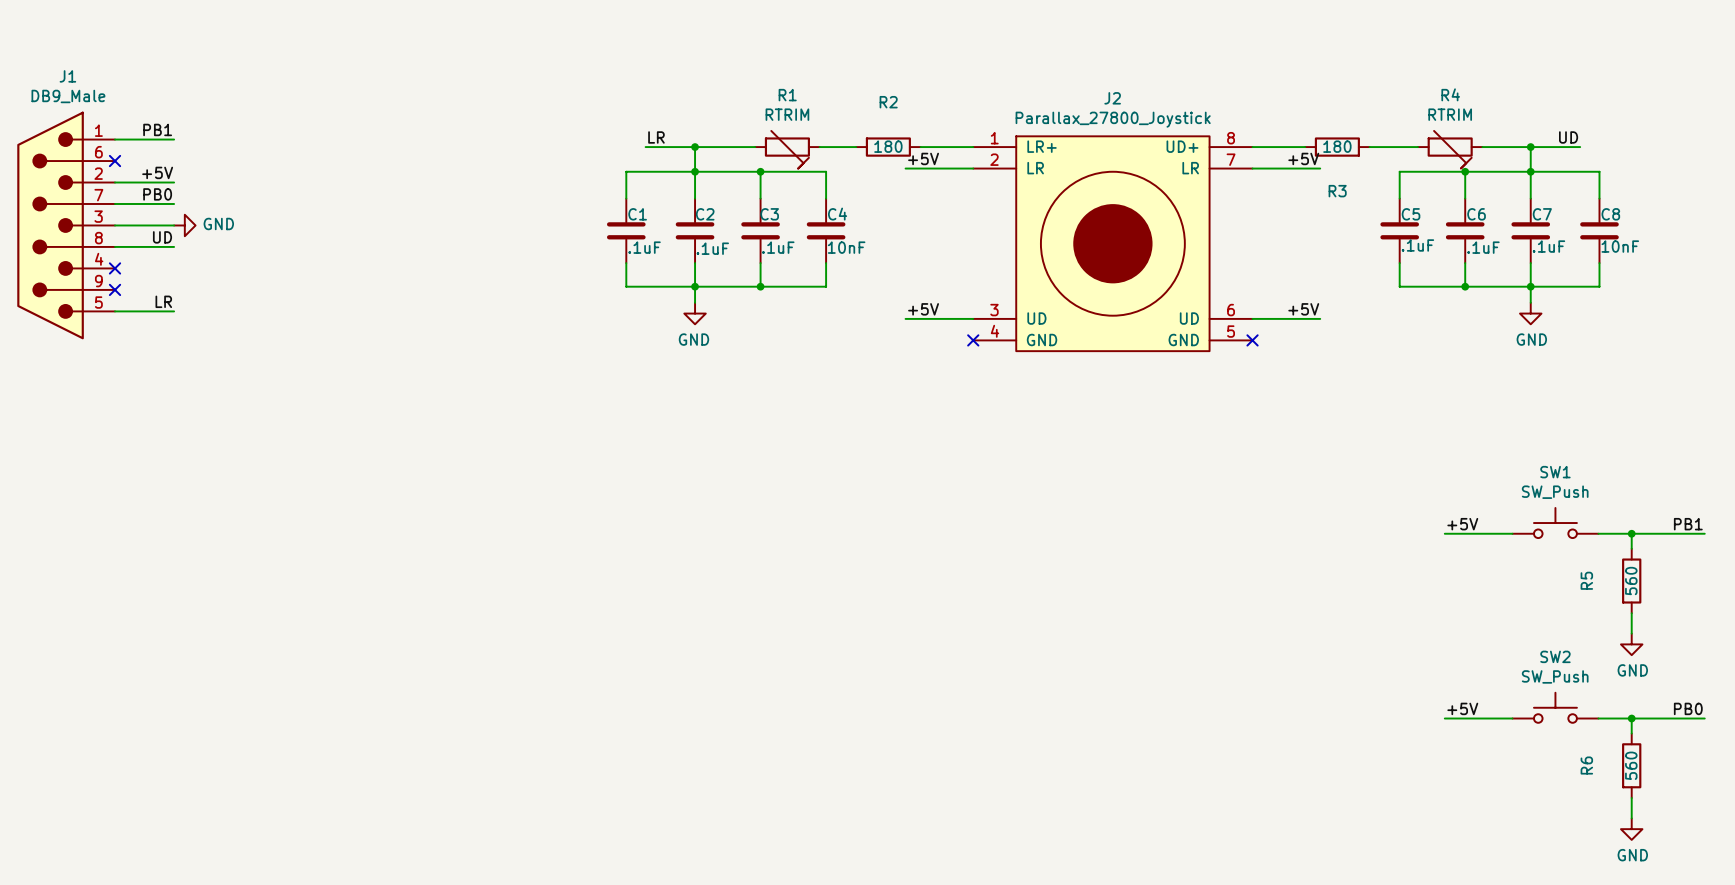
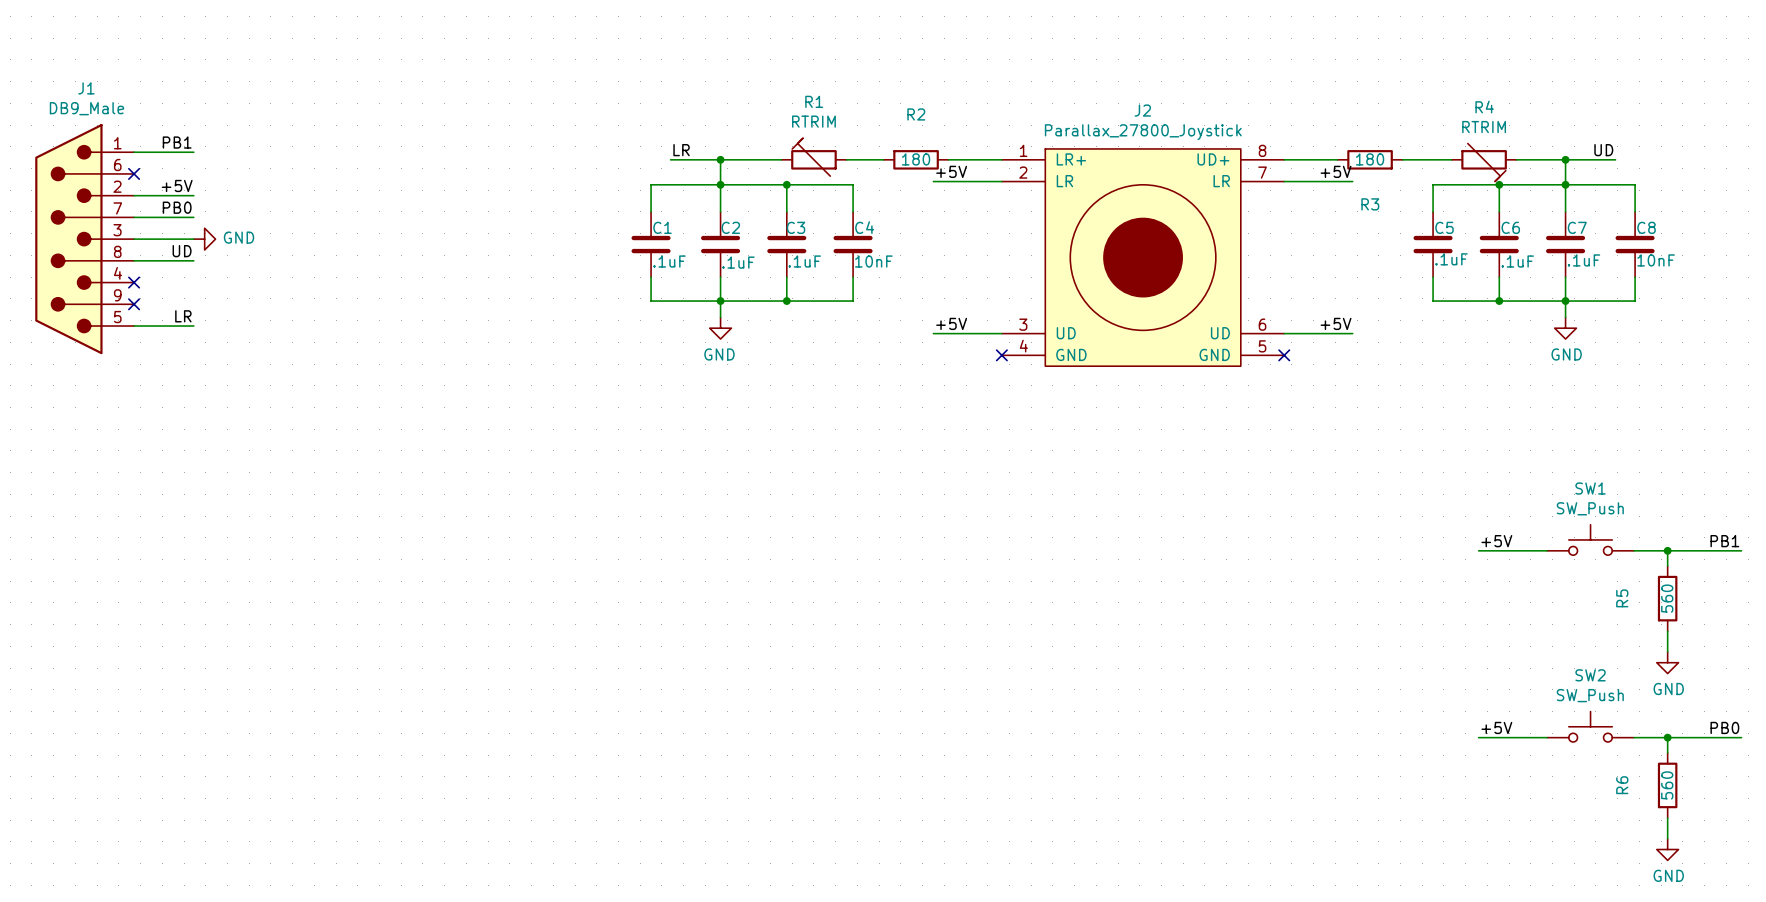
R1 rotation: 0° (787, 149) -> 180° (813, 157)

